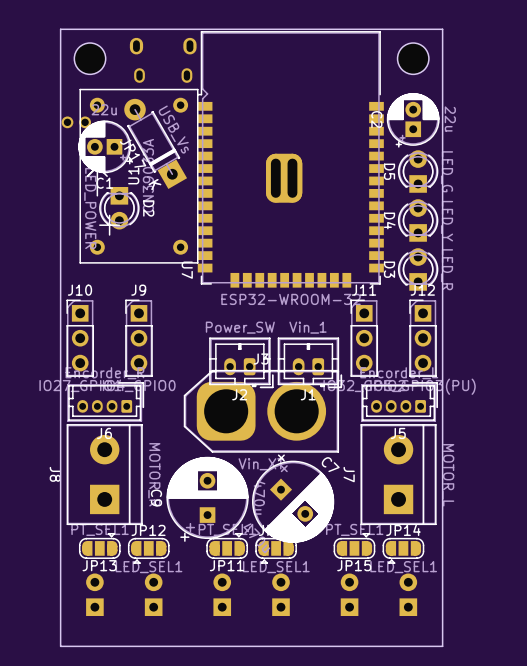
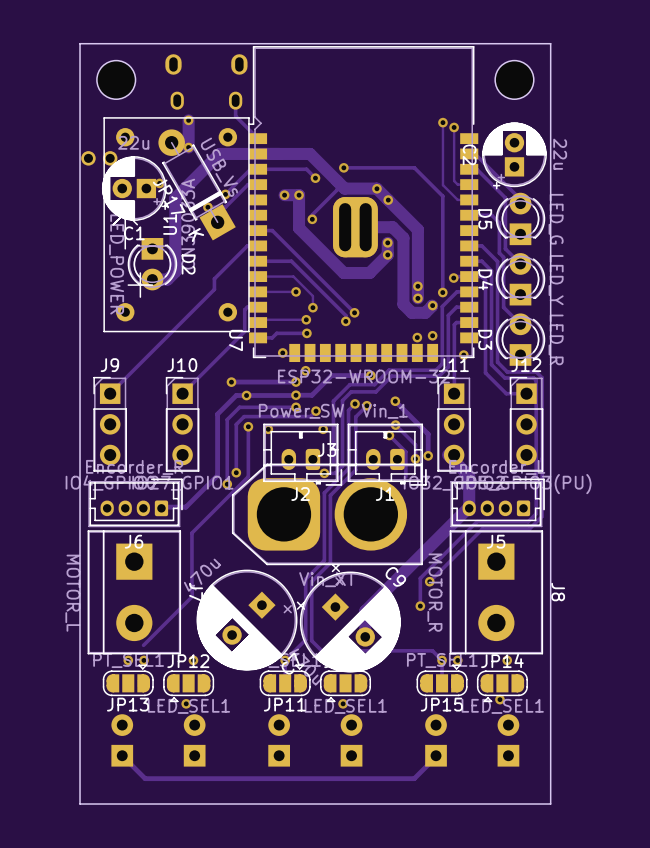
track: none -> (235, 100) (235, 116) (258, 138)
track: none -> (188, 120) (188, 147)
via: none -> (188, 120)
track: none -> (442, 122) (442, 185) (457, 199) (469, 199)
via: none -> (442, 122)
via: none -> (454, 127)
track: none -> (455, 129) (454, 127) (454, 180) (457, 184) (469, 184)
via: none -> (188, 147)
track: none -> (469, 153) (475, 153) (520, 199) (520, 203)
track: none -> (343, 167) (414, 167) (442, 196) (442, 292)
via: none -> (343, 167)
track: none -> (469, 169) (476, 169) (505, 197) (505, 248) (520, 263)
track: none -> (315, 178) (306, 169) (250, 169) (225, 194)
via: none -> (315, 178)
track: none -> (337, 181) (337, 189) (312, 214) (312, 219)
via: none -> (159, 183)
track: none -> (258, 184) (248, 184) (225, 207) (207, 207)
via: none -> (376, 188)
via: none -> (225, 194)
track: none -> (284, 195) (299, 195) (299, 228) (343, 273) (369, 273) (387, 254) (387, 242)
via: none -> (284, 195)
via: none -> (299, 195)
via: none -> (388, 200)
via: none -> (207, 207)
track: none -> (469, 215) (491, 215) (499, 222) (499, 253) (503, 257) (503, 307) (520, 324)
via: none -> (312, 219)
track: none -> (365, 227) (392, 227) (403, 238) (403, 304) (411, 312) (425, 312) (432, 305)
track: none -> (258, 230) (272, 230) (354, 312)
via: none -> (387, 242)
track: none -> (258, 245) (247, 245) (214, 278) (214, 289) (110, 393)
track: none -> (469, 245) (481, 245) (497, 261) (497, 362) (507, 371) (536, 371) (542, 377) (542, 516) (529, 529) (482, 529) (429, 581)
via: none -> (387, 254)
track: none -> (258, 261) (291, 261) (345, 315) (345, 321)
track: none -> (469, 261) (481, 261) (491, 270) (491, 364) (504, 378) (533, 378) (536, 380) (536, 513) (528, 521) (477, 521) (420, 578) (420, 606)
track: none -> (258, 276) (293, 276) (312, 296) (312, 307)
track: none -> (453, 278) (481, 276) (485, 280) (485, 372) (506, 393) (520, 393)
via: none -> (453, 278)
track: none -> (152, 279) (167, 279) (175, 271) (175, 198) (219, 153) (310, 153) (344, 188) (376, 188) (417, 229) (417, 298)
via: none -> (417, 286)
track: none -> (296, 291) (258, 291)
via: none -> (296, 291)
track: none -> (469, 291) (456, 291) (442, 306) (442, 363) (436, 370) (389, 370) (374, 384) (349, 384) (333, 401) (333, 462)
via: none -> (442, 292)
via: none -> (417, 298)
via: none -> (432, 305)
track: none -> (258, 307) (247, 307) (244, 309) (244, 331) (182, 393)
via: none -> (312, 307)
track: none -> (469, 307) (456, 307) (448, 315) (448, 366) (439, 376) (391, 376) (375, 391) (351, 391) (342, 400) (342, 466) (335, 473) (324, 473)
via: none -> (354, 312)
track: none -> (306, 319) (260, 319) (258, 322)
via: none -> (306, 319)
via: none -> (345, 321)
track: none -> (469, 322) (456, 322) (454, 324) (454, 387) (448, 393)
track: none -> (306, 333) (276, 333) (272, 337) (258, 337)
via: none -> (306, 333)
via: none -> (432, 335)
via: none -> (417, 337)
via: none -> (282, 352)
via: none -> (463, 355)
via: none -> (305, 370)
track: none -> (370, 375) (331, 375) (311, 395) (236, 395) (217, 414) (217, 475) (185, 507) (161, 507)
via: none -> (370, 375)
via: none -> (231, 382)
track: none -> (296, 382) (231, 382)
via: none -> (296, 382)
via: none -> (246, 395)
via: none -> (296, 395)
track: none -> (395, 401) (428, 434) (428, 455)
via: none -> (395, 401)
track: none -> (355, 403) (348, 410) (348, 468) (324, 492) (324, 560) (305, 579) (305, 639) (285, 660) (285, 683)
via: none -> (355, 403)
track: none -> (366, 405) (355, 416) (355, 470) (330, 495) (330, 562) (311, 581) (311, 640) (321, 650) (432, 650) (442, 660) (442, 683)
via: none -> (366, 405)
track: none -> (296, 407) (239, 407) (227, 419) (227, 484)
via: none -> (296, 407)
track: none -> (316, 411) (310, 416) (244, 416) (236, 424) (236, 472)
via: none -> (316, 411)
J10 position: (80, 338) -> (182, 424)
J9 position: (138, 338) -> (110, 424)
track: none -> (395, 425) (415, 444) (415, 458)
via: none -> (395, 425)
track: none -> (248, 426) (248, 476) (191, 533) (192, 596) (143, 645)
via: none -> (248, 426)
via: none -> (268, 429)
via: none -> (323, 429)
track: none -> (389, 435) (405, 451) (405, 476)
via: none -> (389, 435)
via: none -> (428, 455)
track: none -> (448, 454) (469, 476) (469, 507) (365, 611) (365, 636)
via: none -> (415, 458)
via: none -> (236, 472)
via: none -> (324, 473)
via: none -> (227, 484)
via: none -> (429, 581)
J8 rotation: 0° (104, 474) -> 180° (496, 592)
J8 position: (104, 474) -> (496, 592)
J7 rotation: 0° (398, 474) -> 180° (134, 592)
J7 position: (398, 474) -> (134, 592)
via: none -> (420, 606)
C7 rotation: 0° (293, 498) -> 90° clockwise (250, 620)
C7 position: (293, 498) -> (250, 620)
C9 rotation: 0° (207, 499) -> 135° clockwise (350, 618)
C9 position: (207, 499) -> (350, 618)
via: none -> (128, 660)
via: none -> (143, 660)
via: none -> (193, 660)
via: none -> (285, 660)
via: none -> (442, 660)
via: none -> (457, 660)
via: none -> (507, 660)
via: none -> (499, 699)
via: none -> (186, 703)
via: none -> (343, 703)
track: none -> (436, 755) (414, 778) (145, 778) (122, 755)

